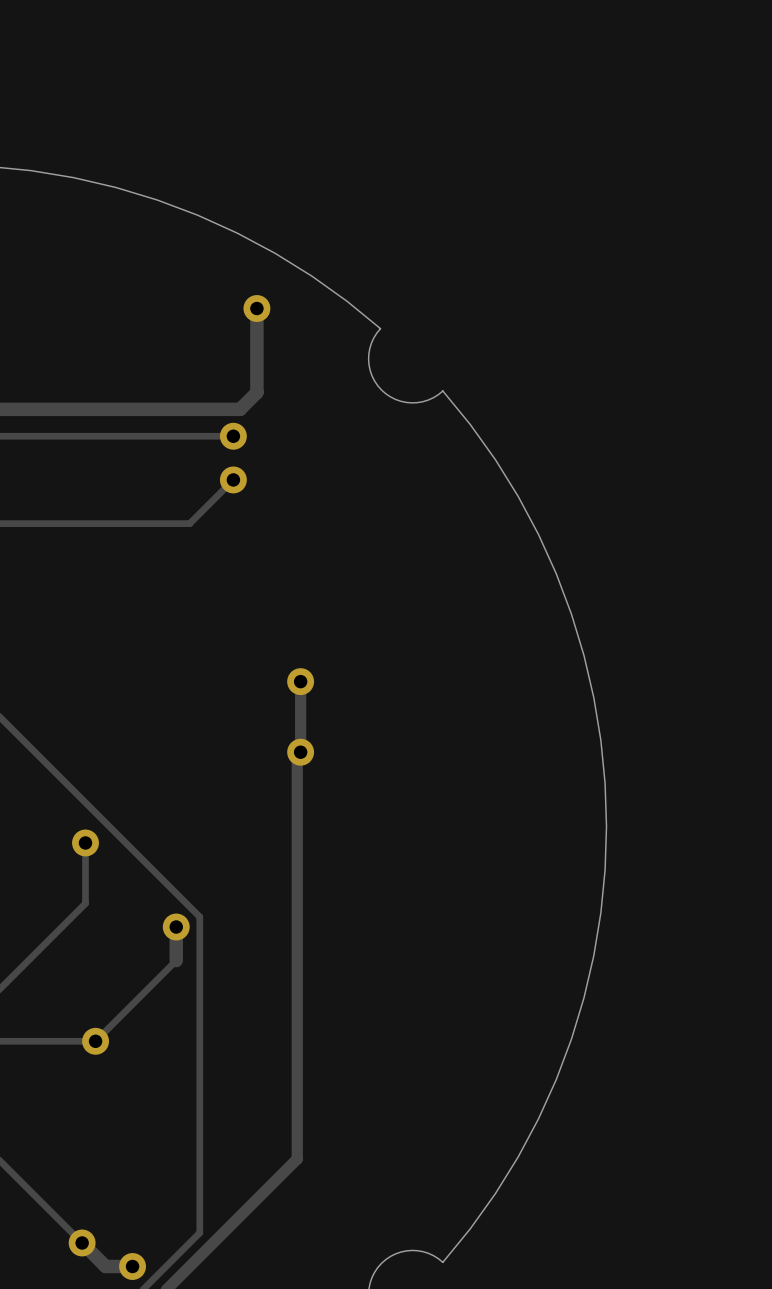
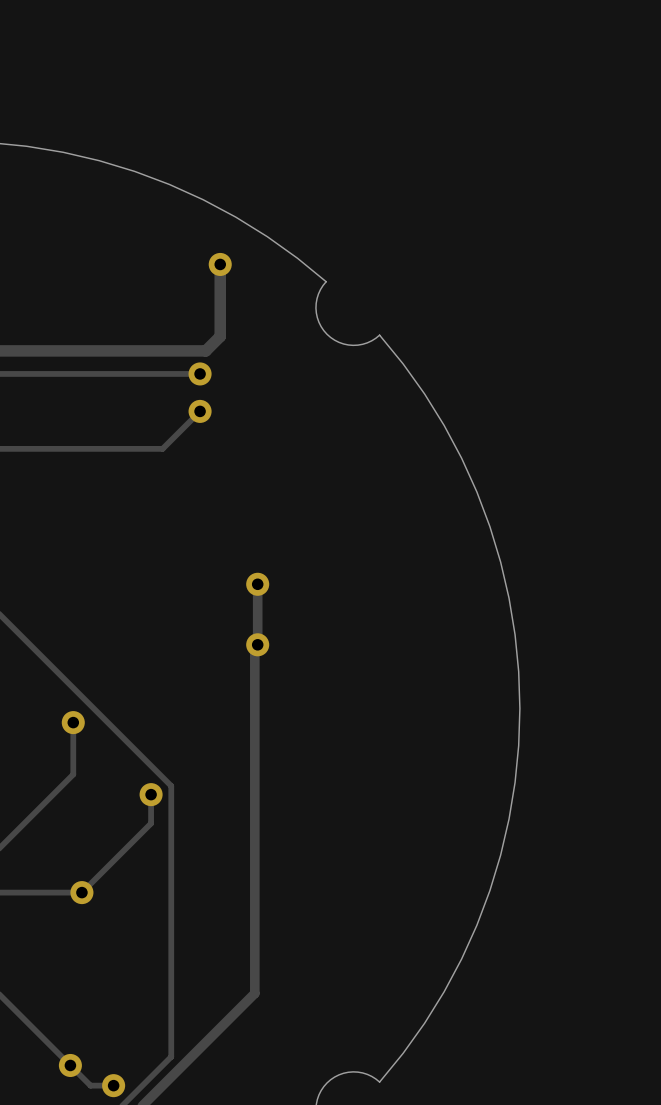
track width: thick (176, 927) (176, 960) -> thin (151, 794) (151, 823)
track width: thick (82, 1242) (105, 1266) (132, 1266) -> thin (70, 1065) (90, 1085) (113, 1085)

